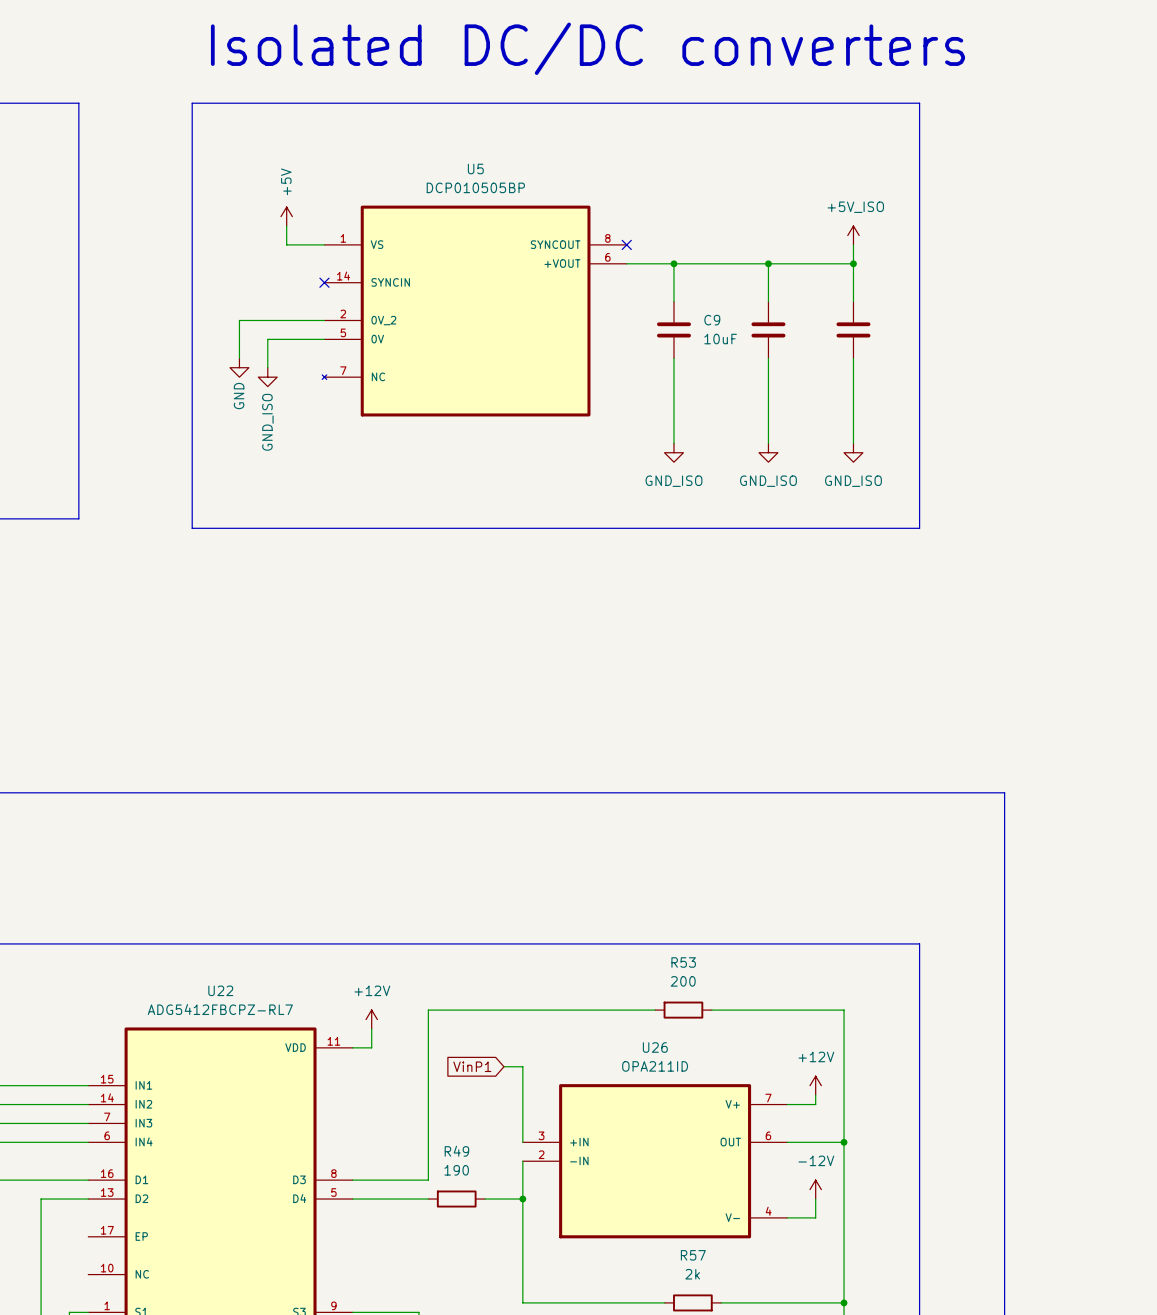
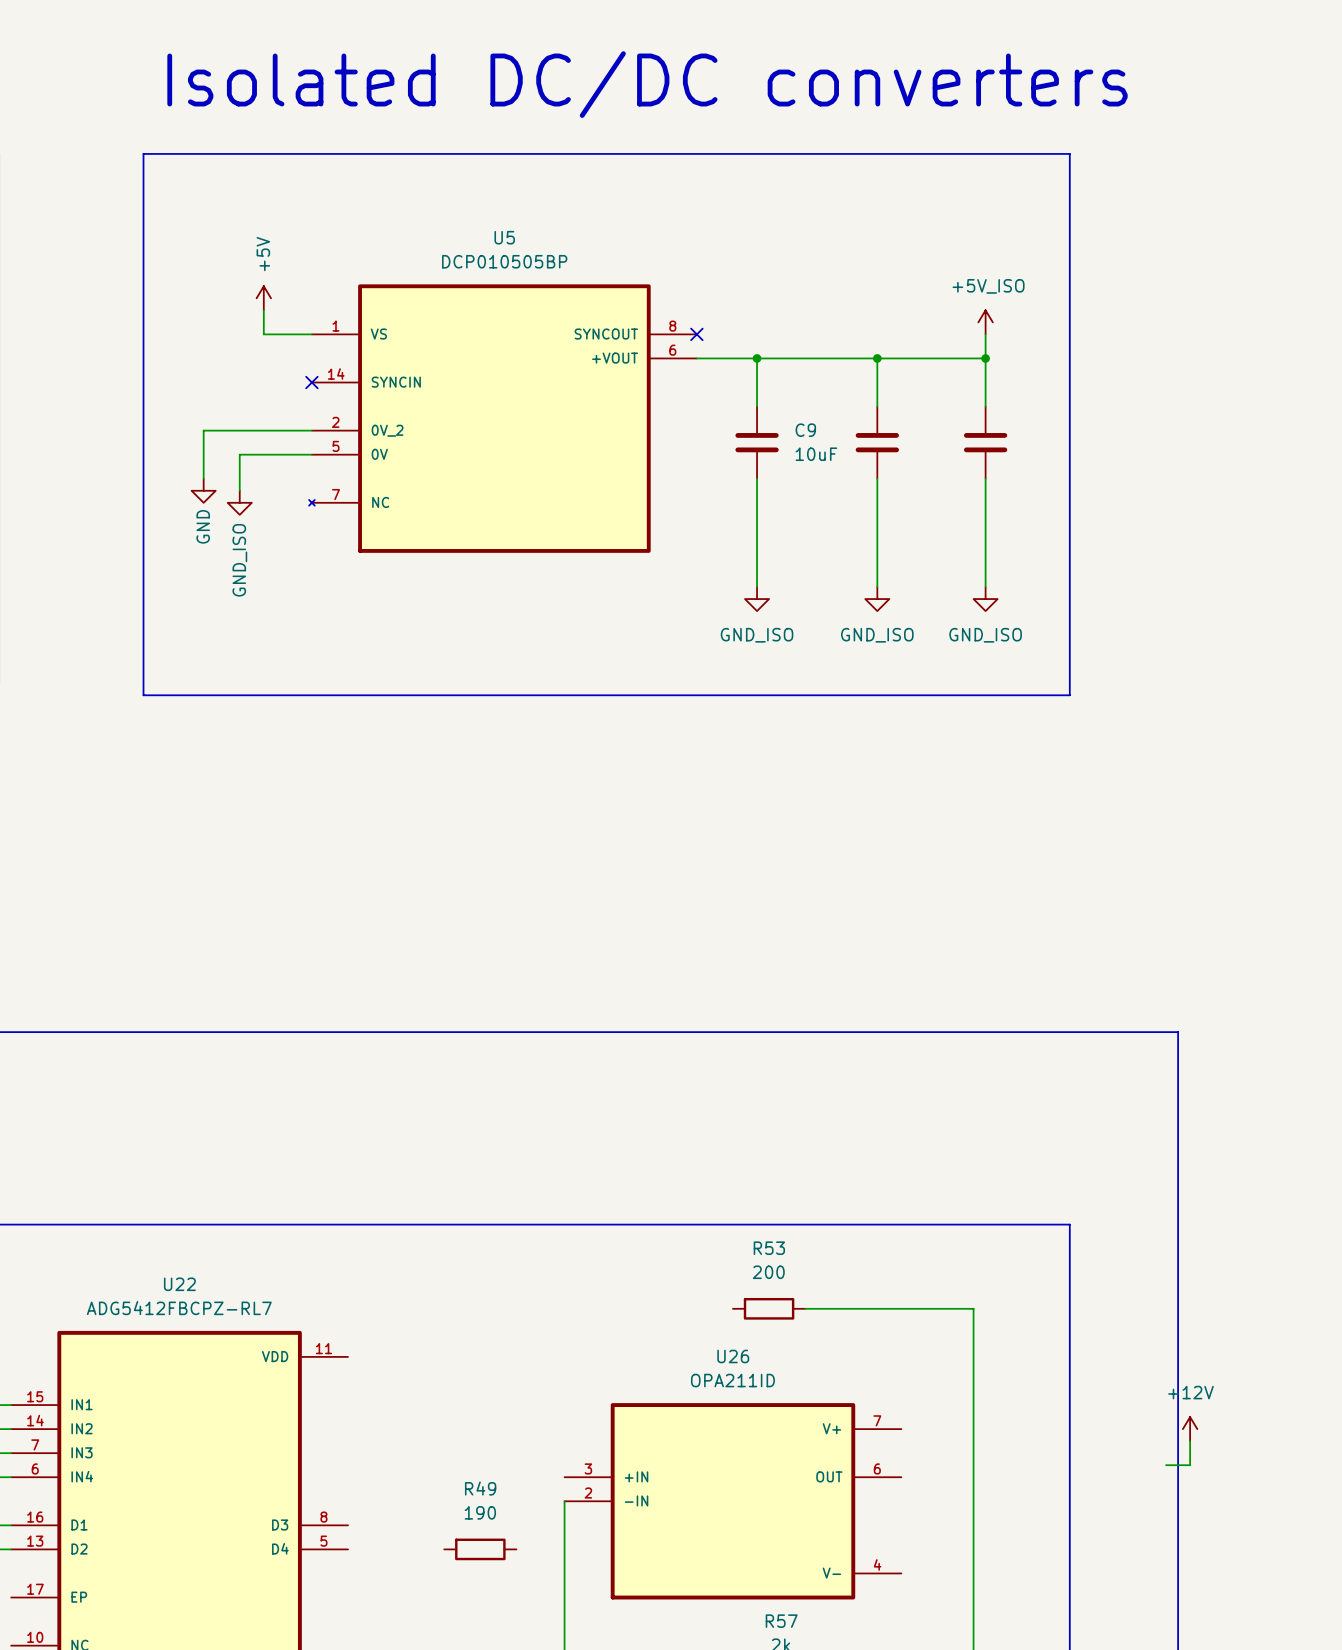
wire: (655, 1010) (428, 1010) (428, 1180) (352, 1180) -> none
power symbol: +12V (371, 1019) -> none
wire: (371, 1028) (371, 1047) (352, 1047) -> none
global label: VinP1 (472, 1066) -> none
wire: (503, 1066) (522, 1066) (522, 1142) -> none
power symbol: +12V (815, 1085) -> none
wire: (815, 1095) (815, 1104) (787, 1104) -> none
power symbol: none -> +12V (1190, 1429)
wire: none -> (1190, 1441) (1190, 1465) (1166, 1465)
wire: (787, 1142) (844, 1142) -> none
junction: (844, 1142) -> none
power symbol: -12V (815, 1189) -> none
wire: (352, 1199) (428, 1199) -> none
wire: (485, 1199) (522, 1199) -> none
junction: (522, 1199) -> none
wire: (815, 1199) (815, 1217) (787, 1217) -> none

